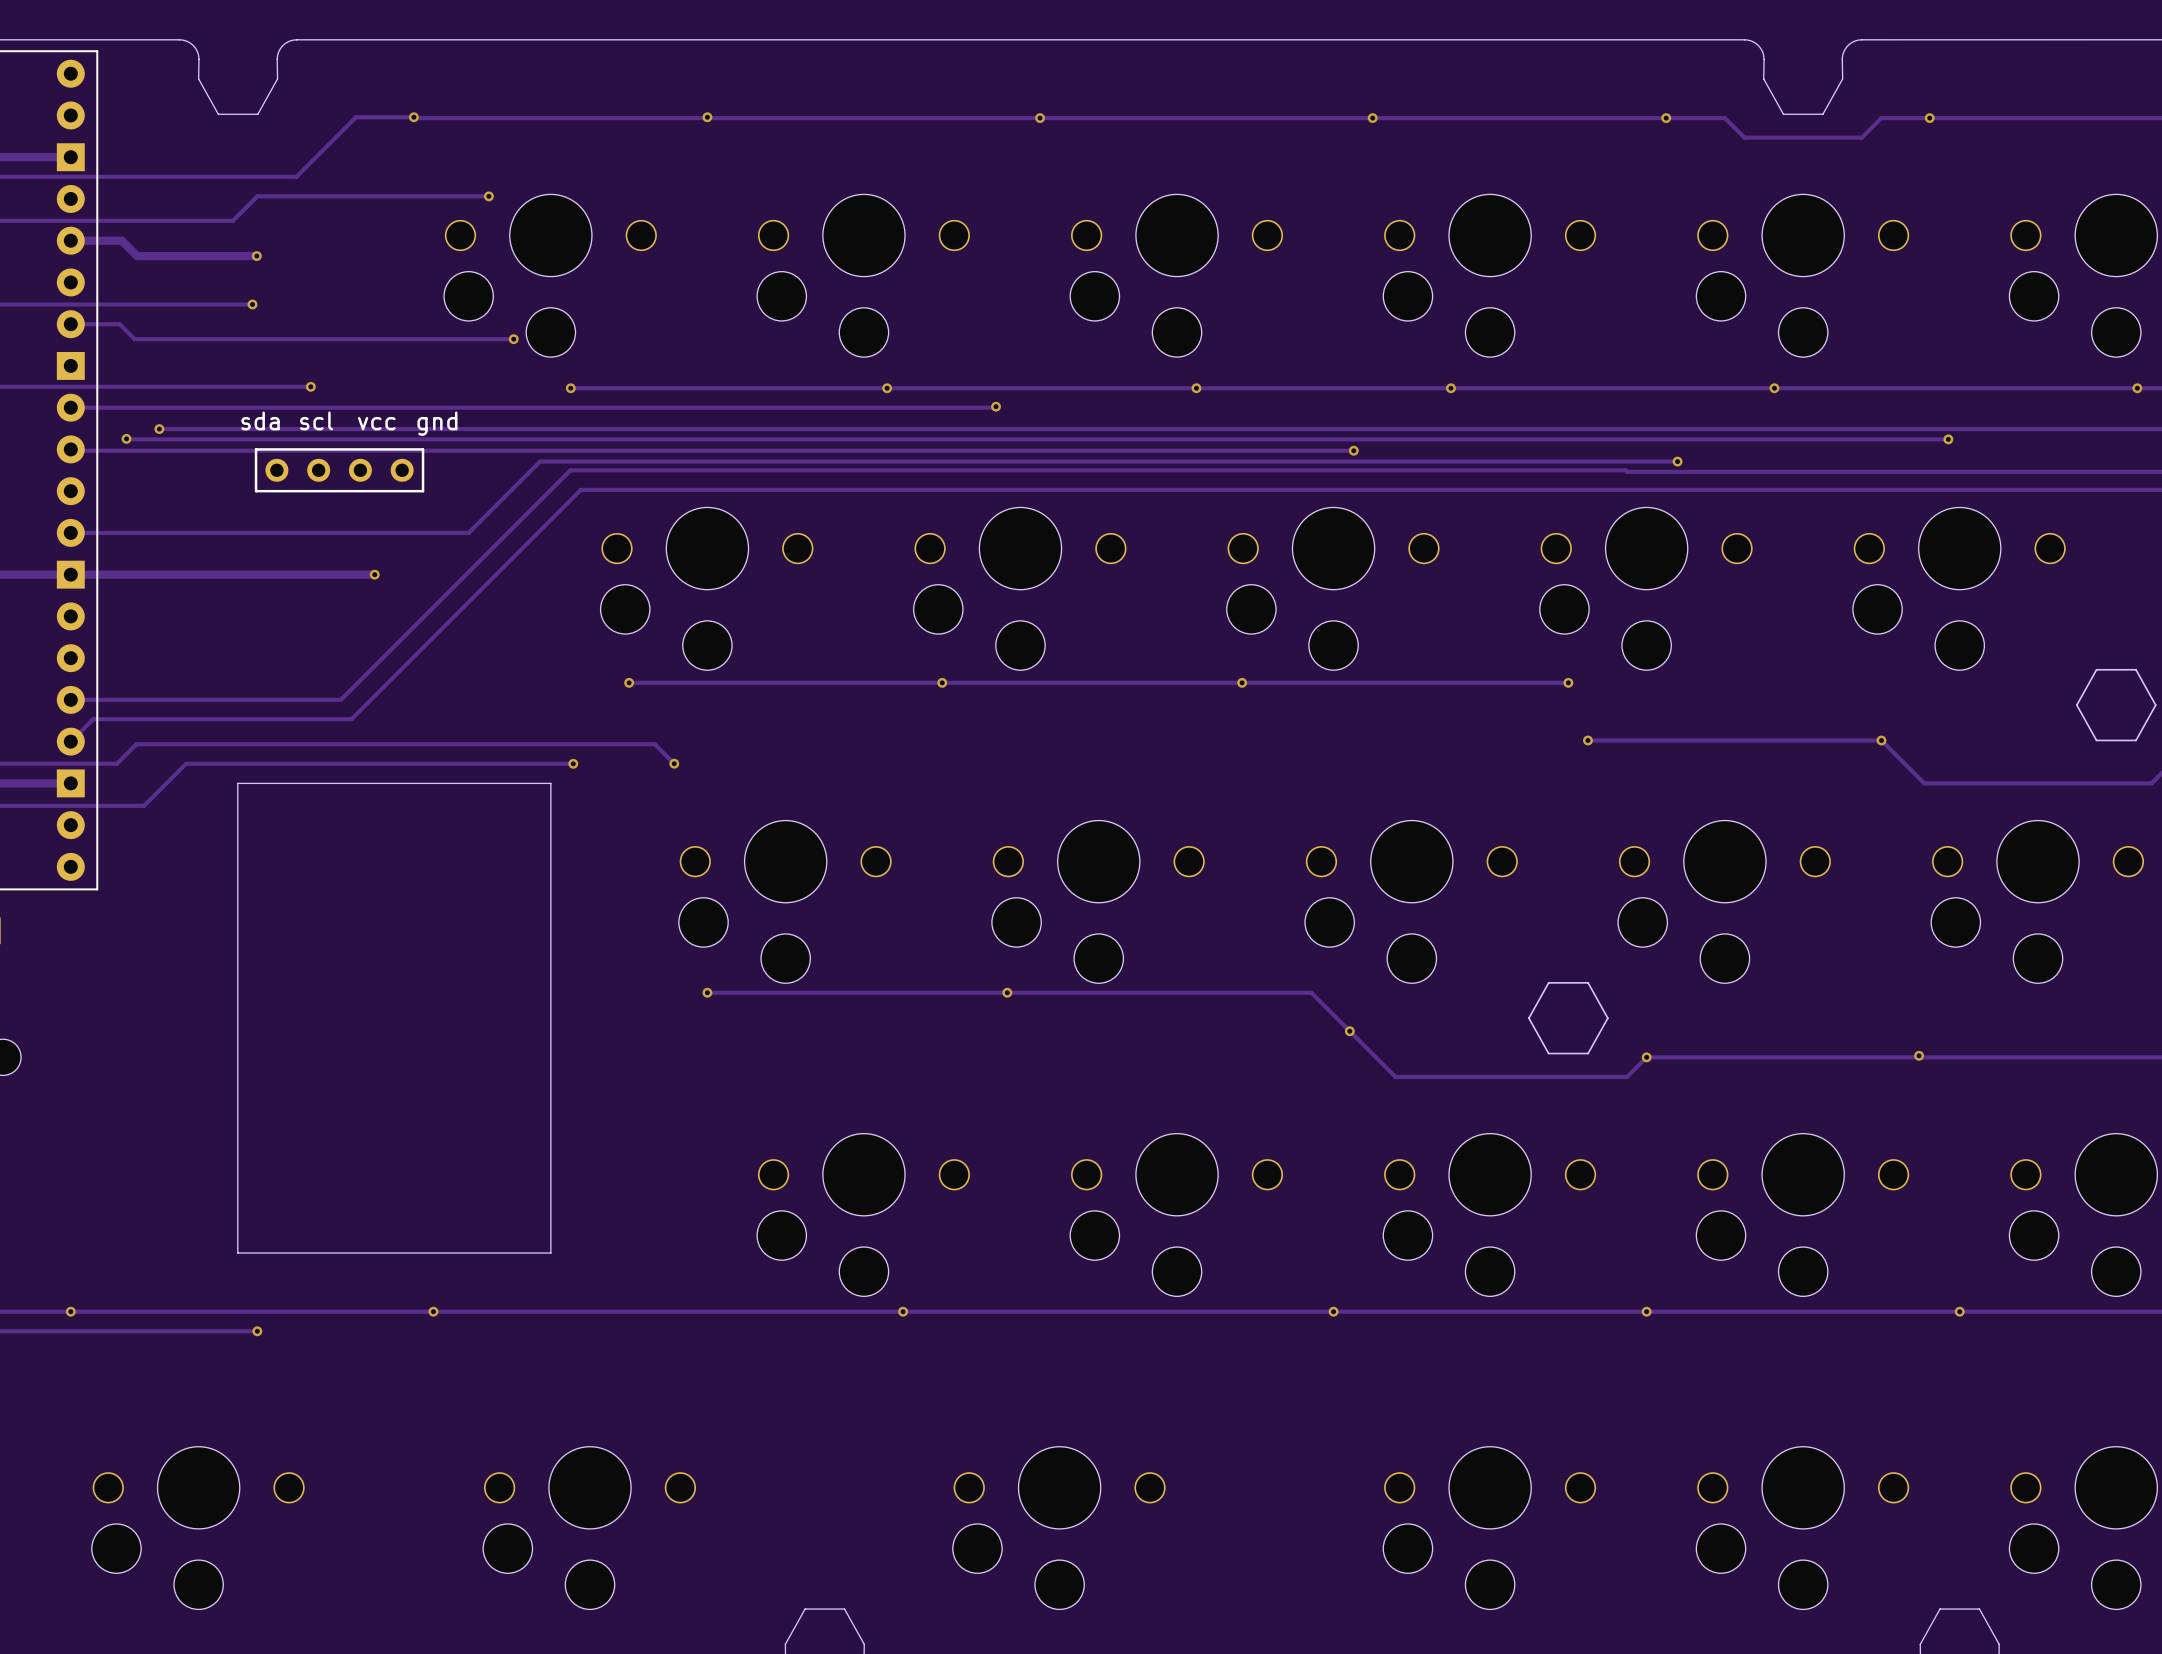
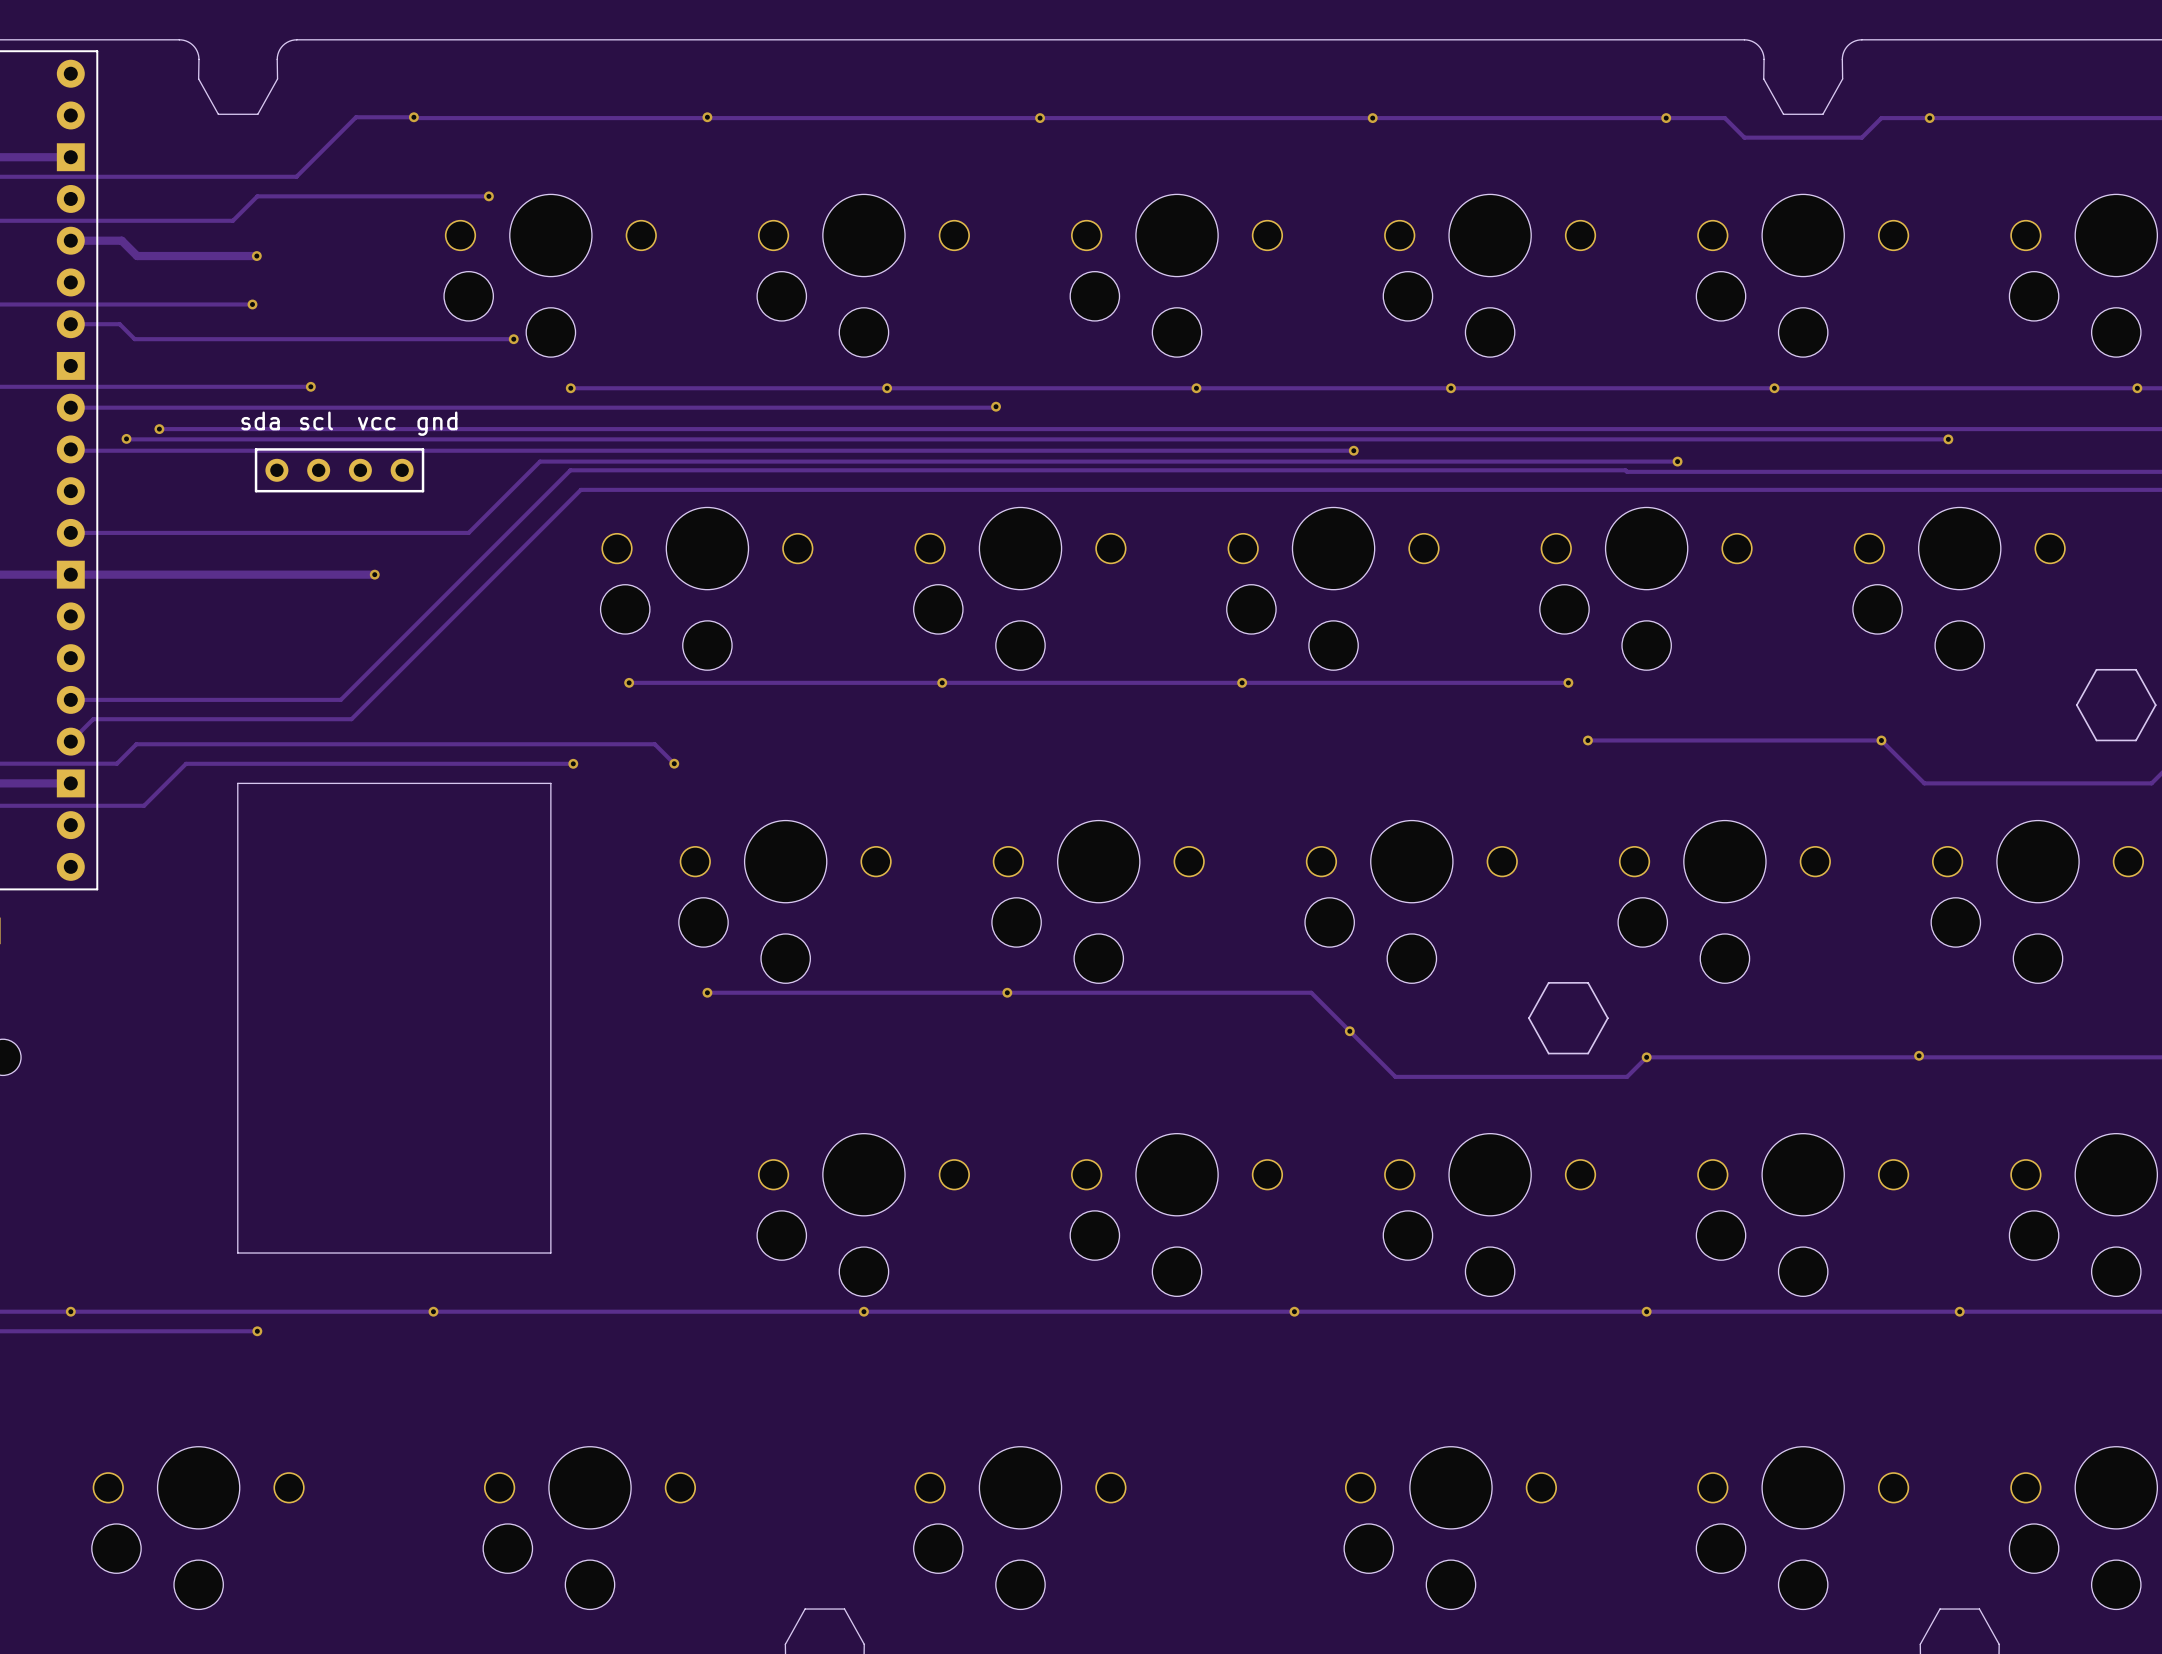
via position: (903, 1311) -> (863, 1311)
via position: (1333, 1311) -> (1294, 1311)
part position: (1059, 1528) -> (1020, 1528)
part position: (1489, 1528) -> (1450, 1528)

